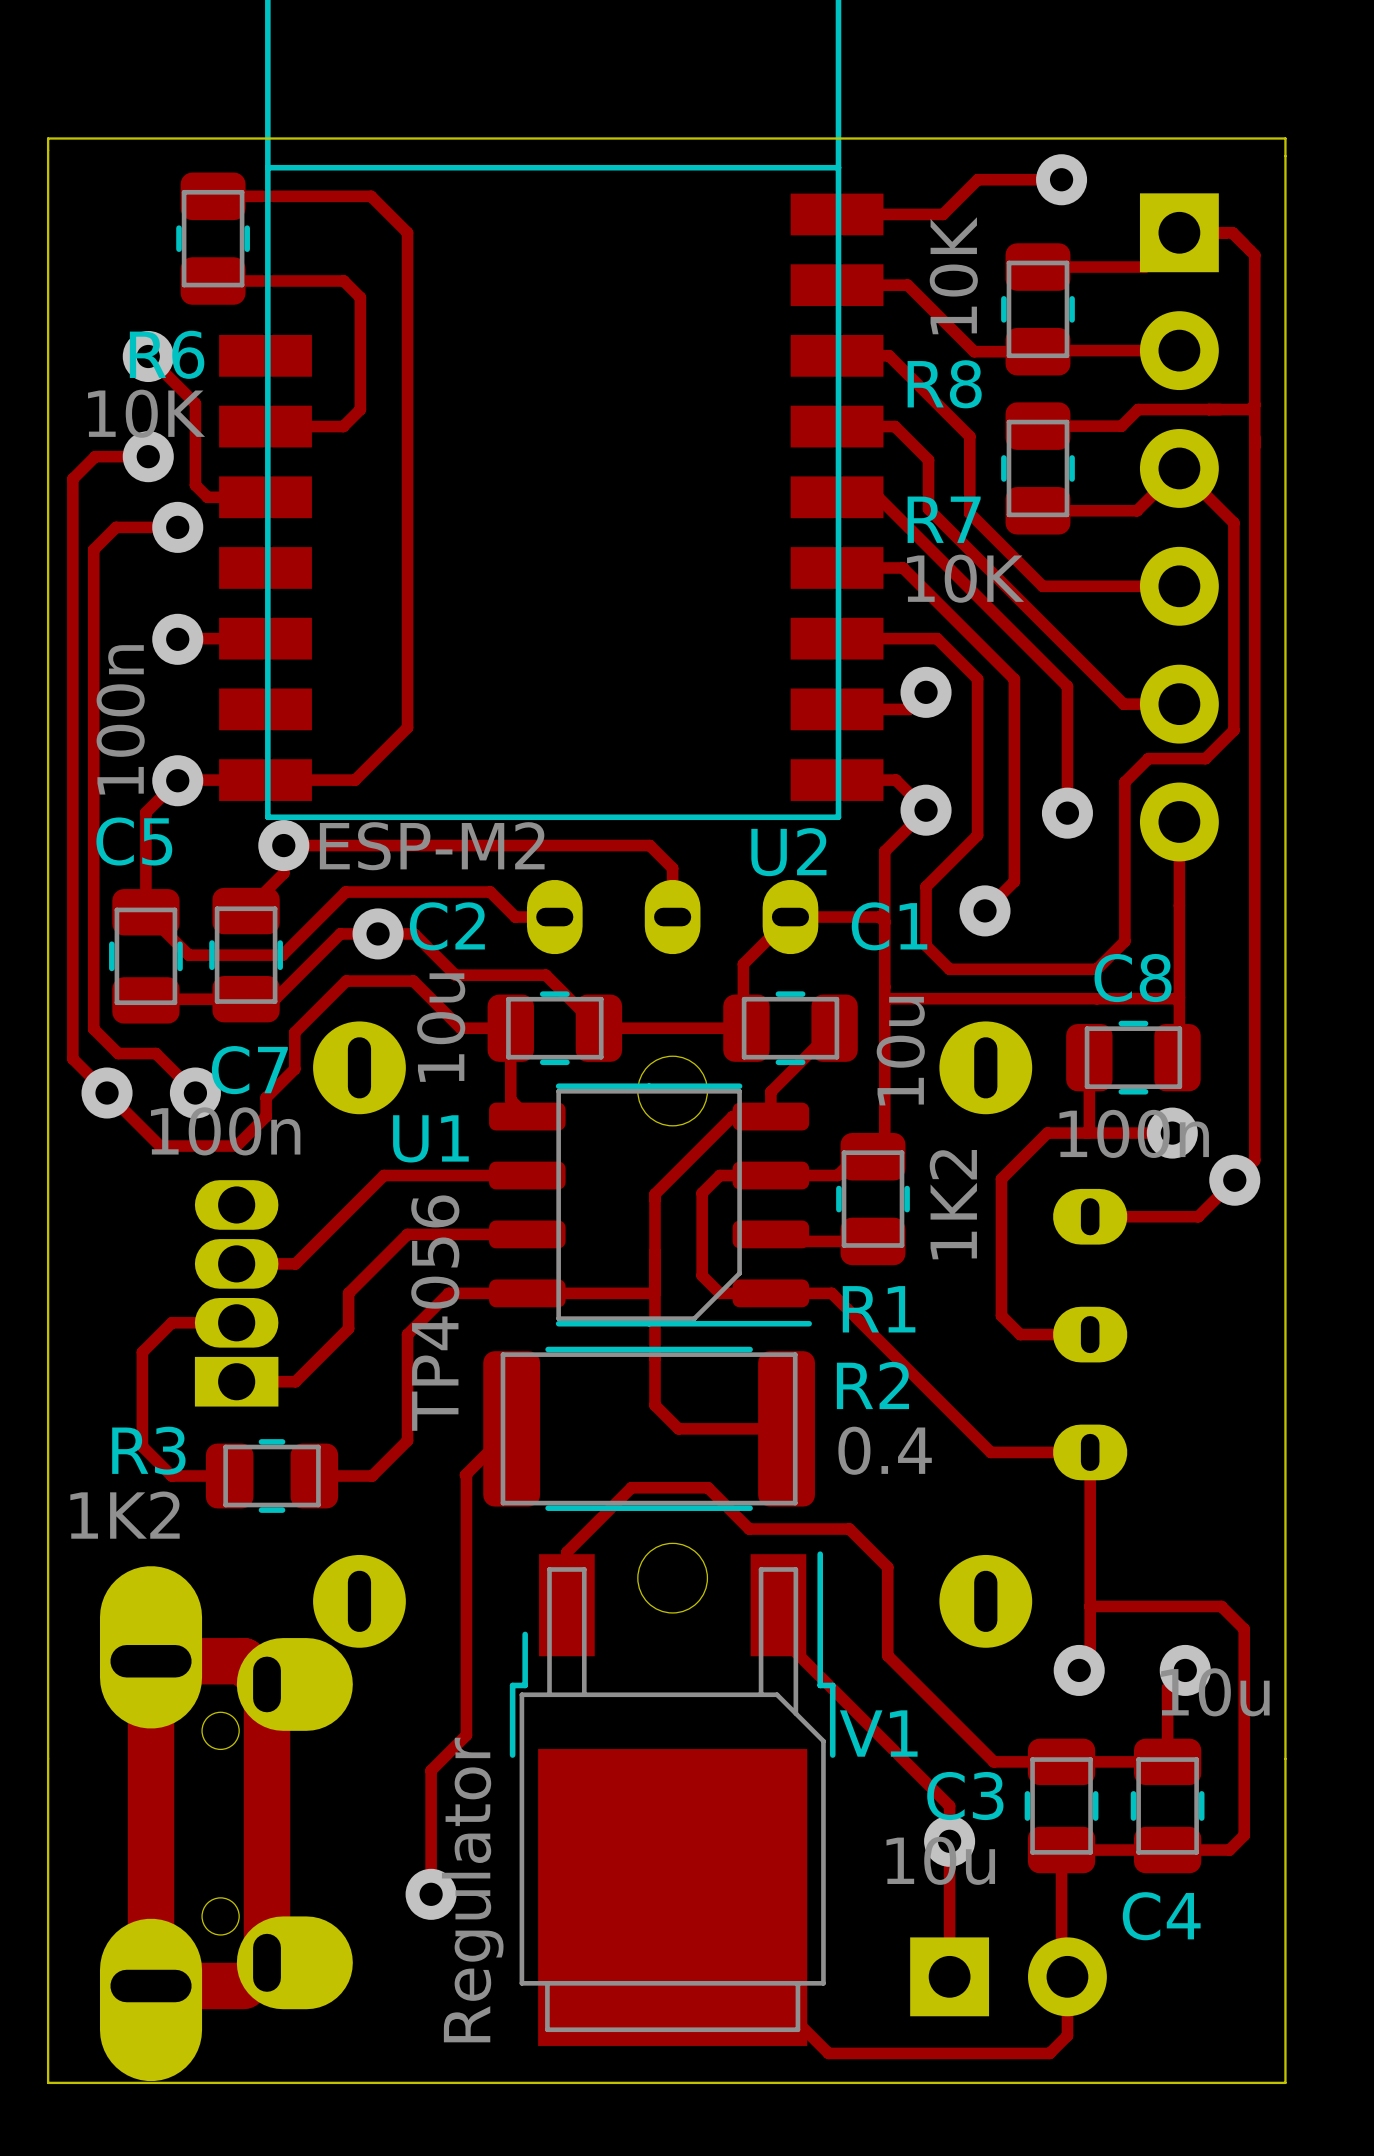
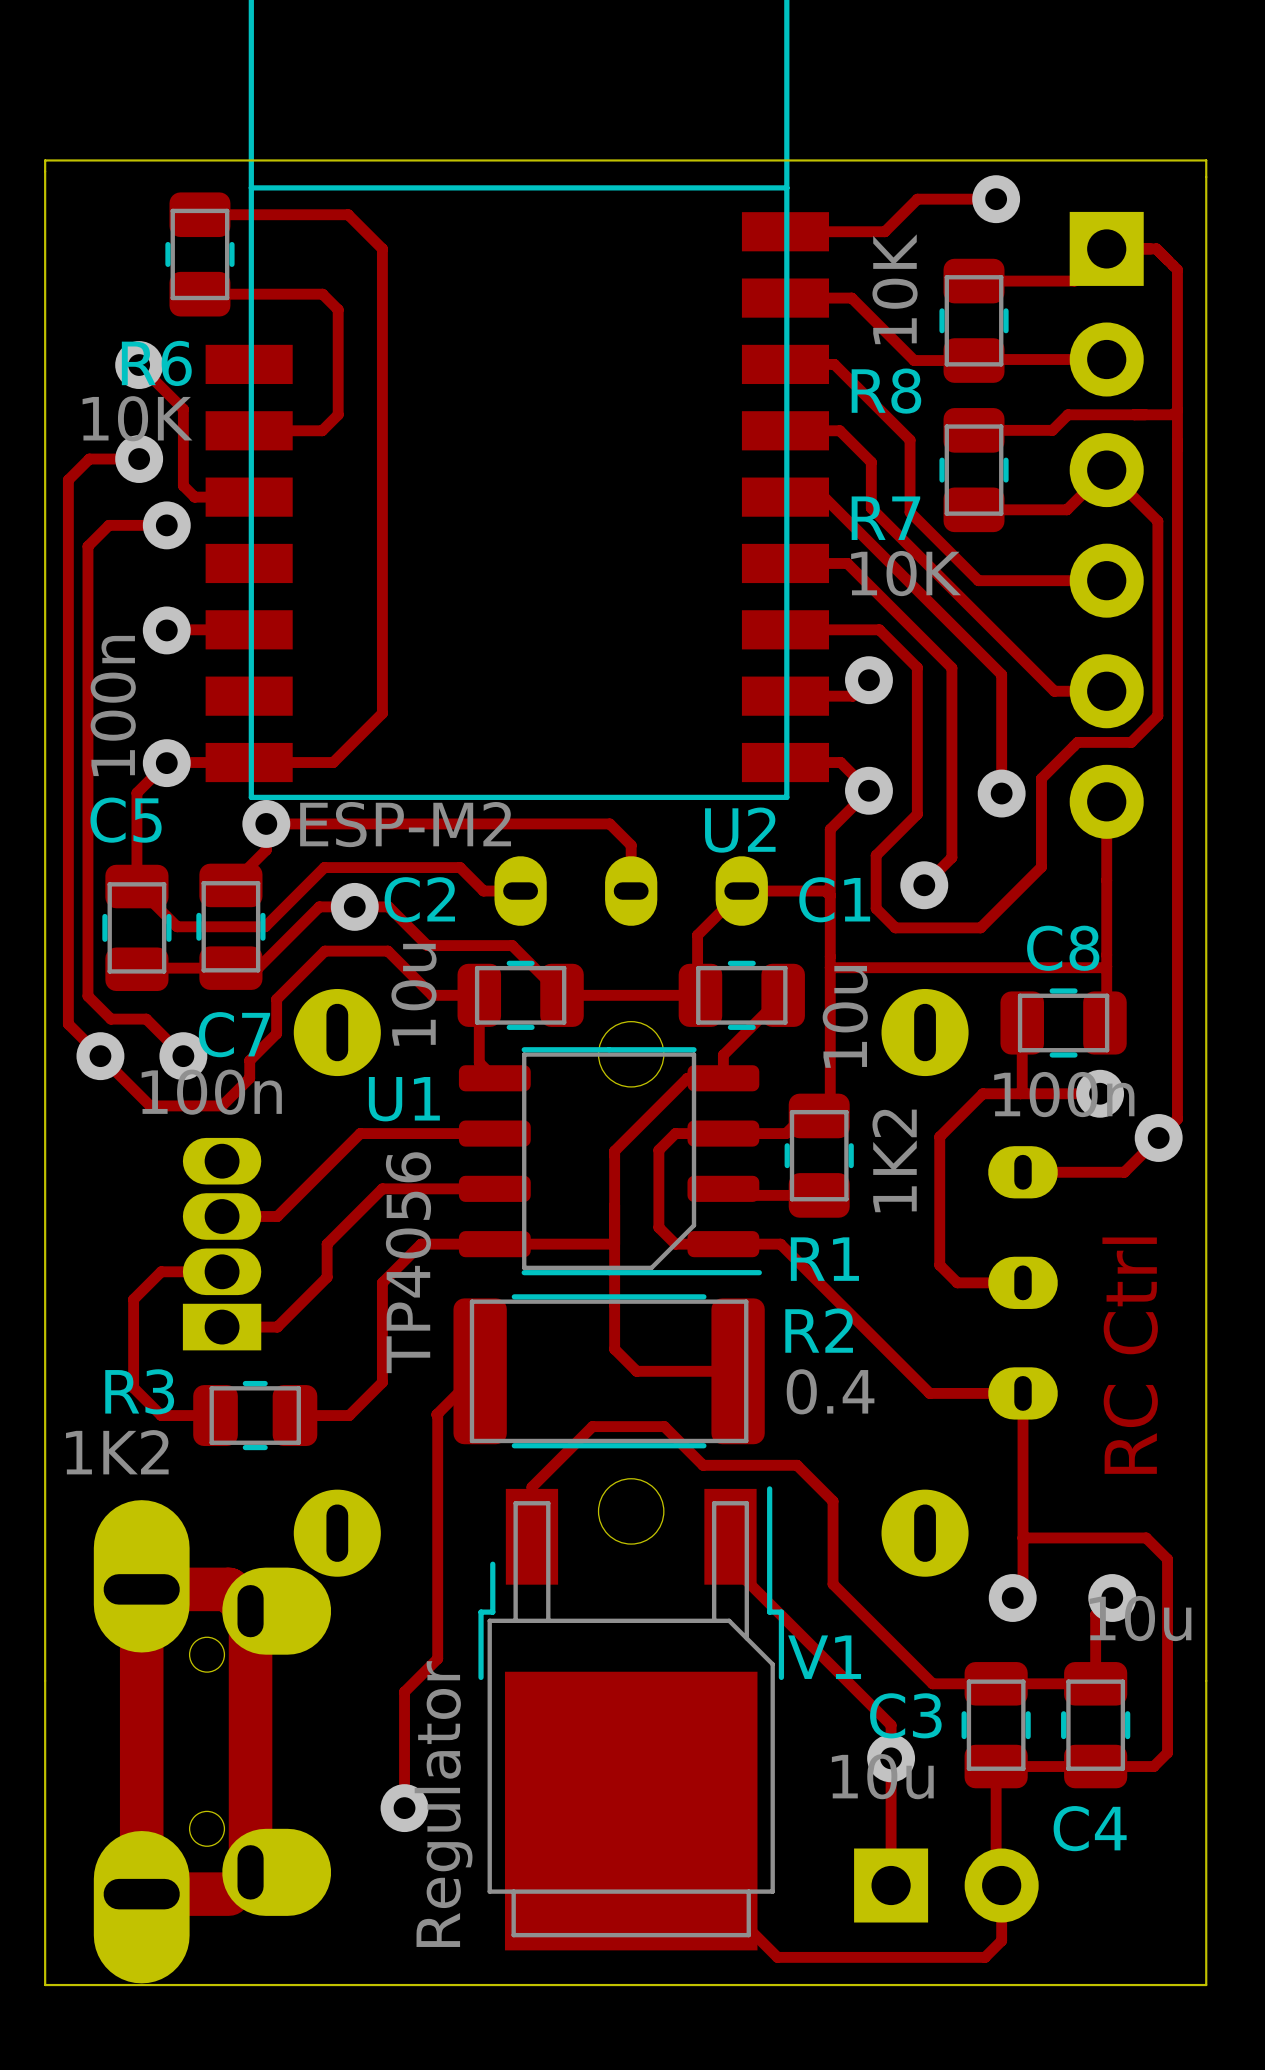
track: (1124, 782) (1124, 941) (1096, 969) (949, 969) (926, 945) (926, 886) (933, 879) -> (1055, 764) (1041, 778) (1041, 867) (980, 927) (895, 927) (876, 908) (876, 855)
text: none -> RC Ctrl (1130, 1355)

